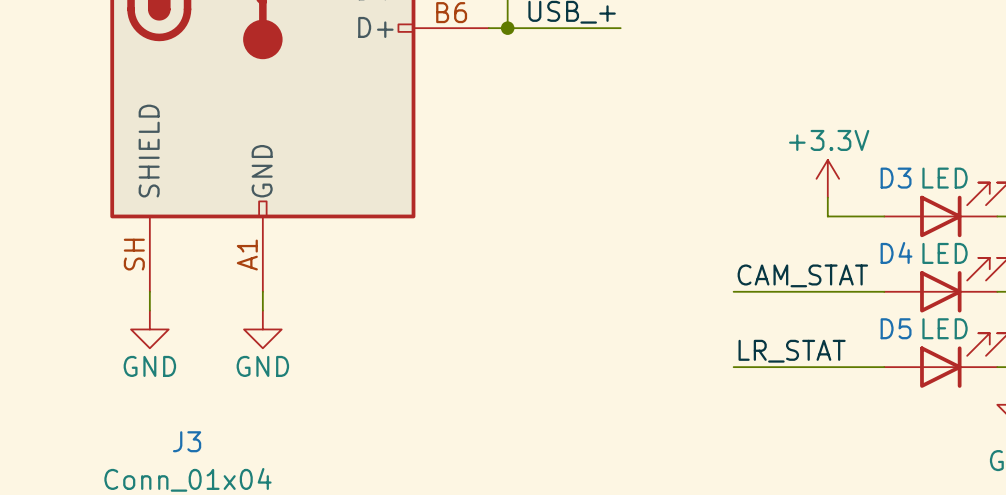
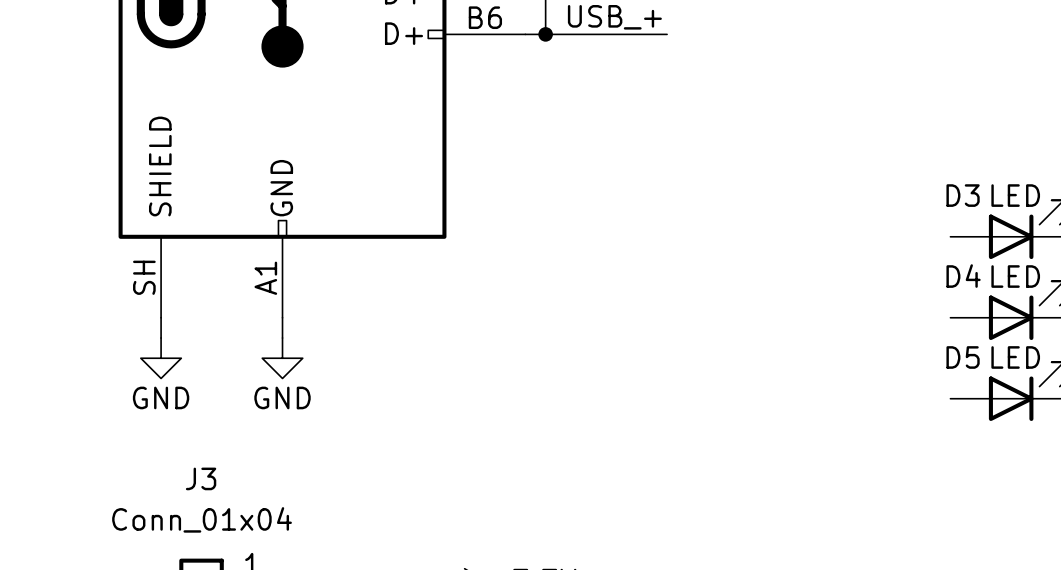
power symbol: +3.3V (827, 178) -> none
wire: (827, 197) (827, 216) (884, 216) -> none
label: CAM_STAT (802, 275) -> none
wire: (733, 291) (884, 291) -> none
label: LR_STAT (792, 351) -> none
wire: (733, 367) (884, 367) -> none

